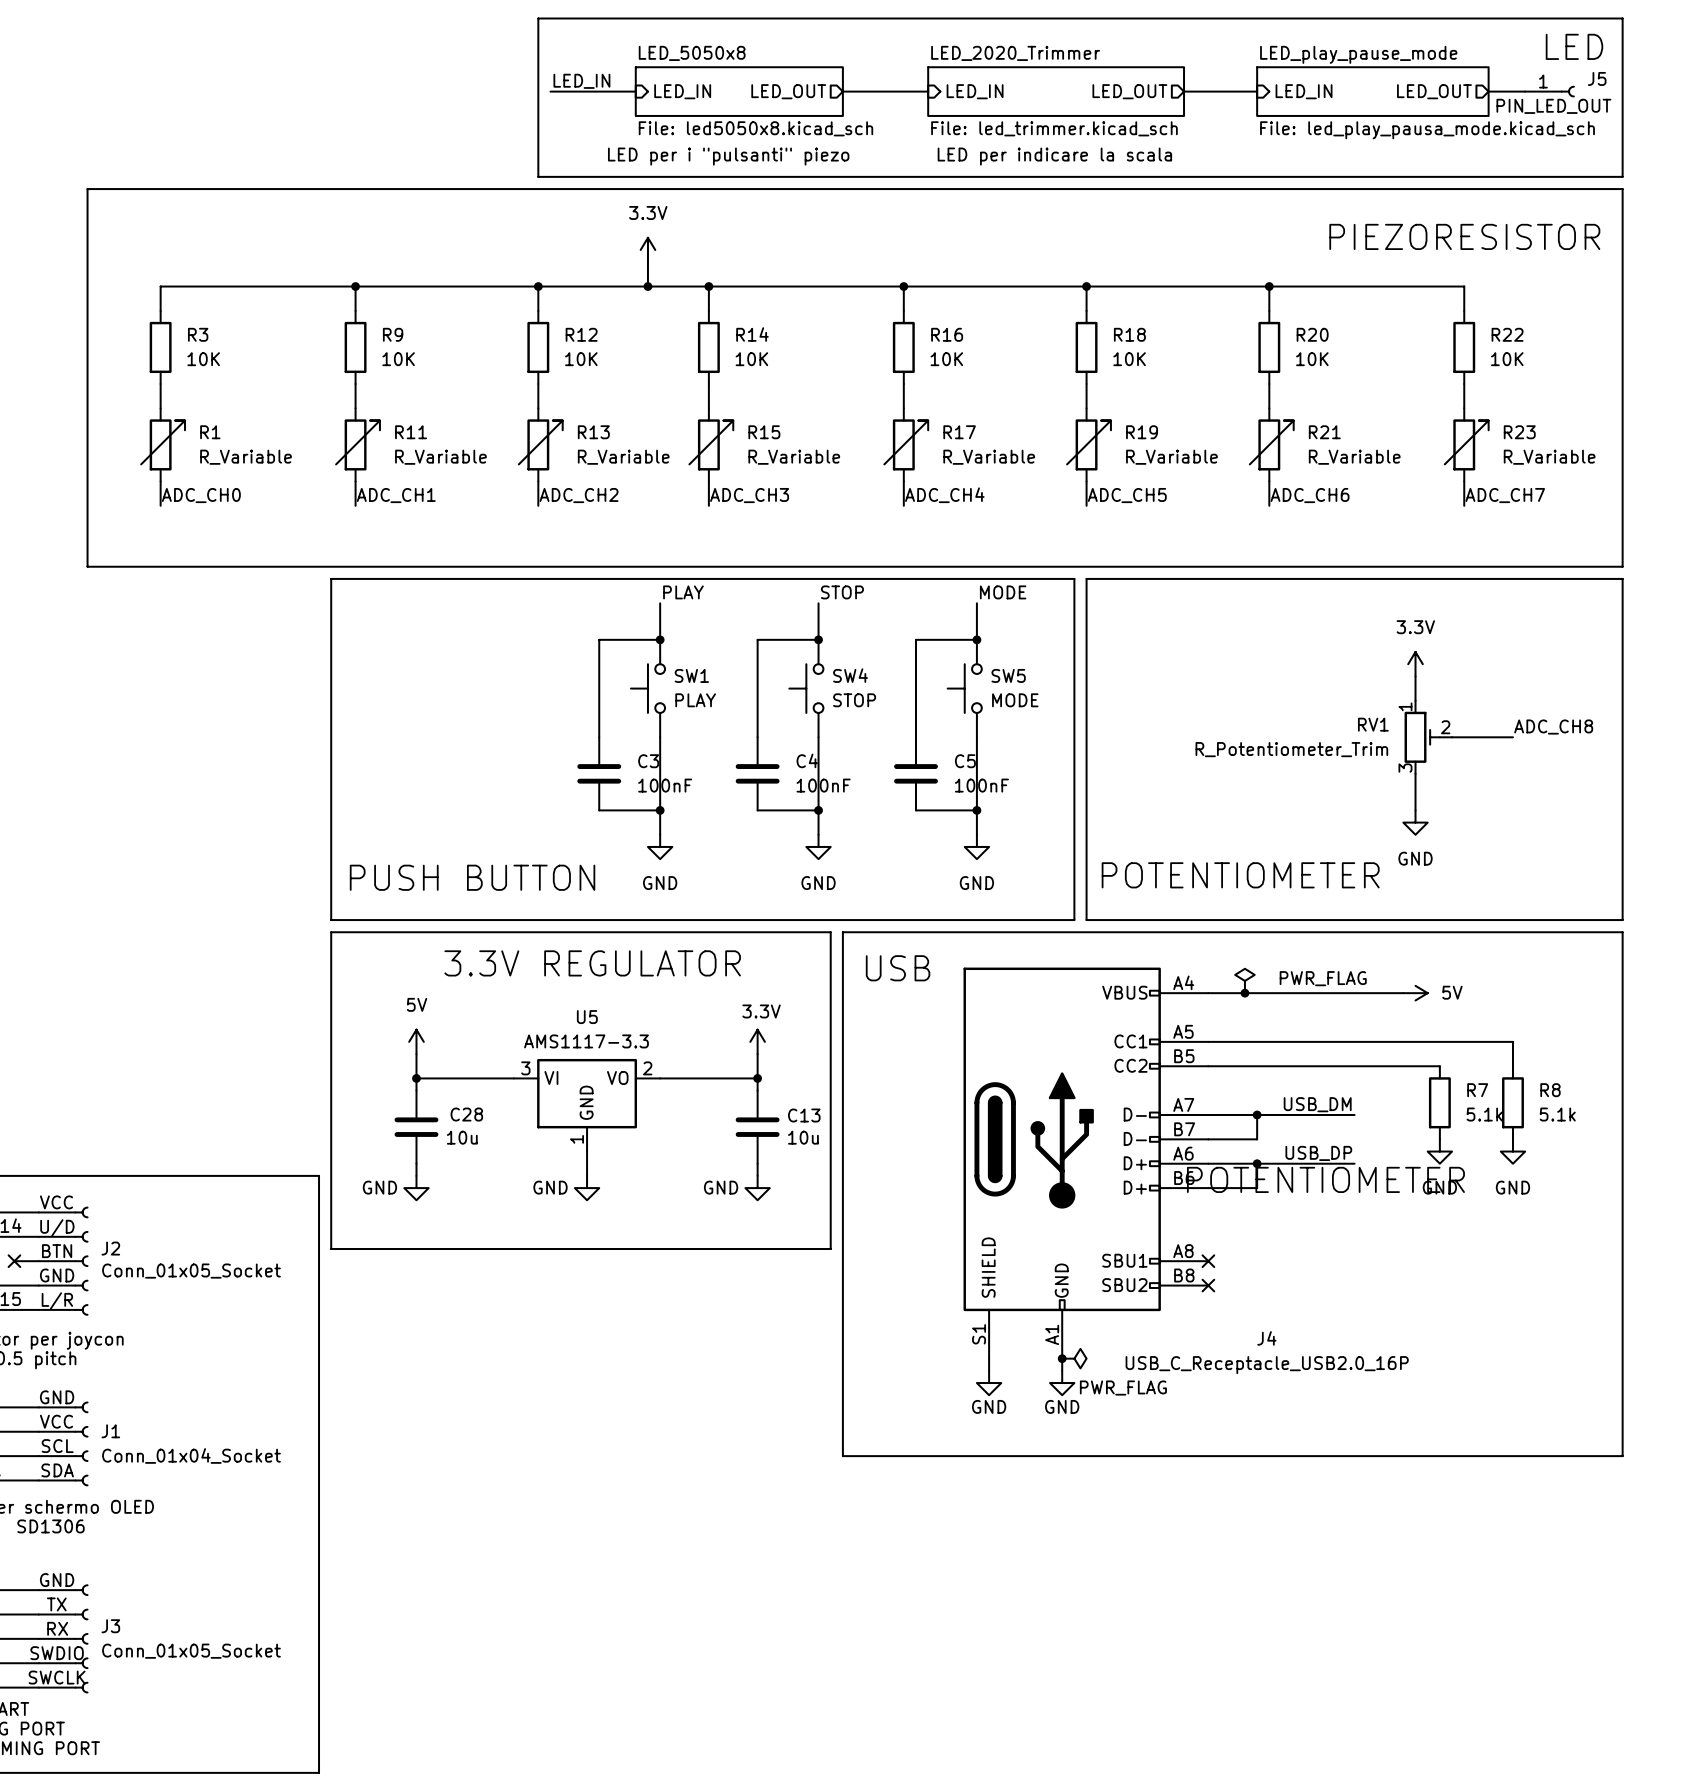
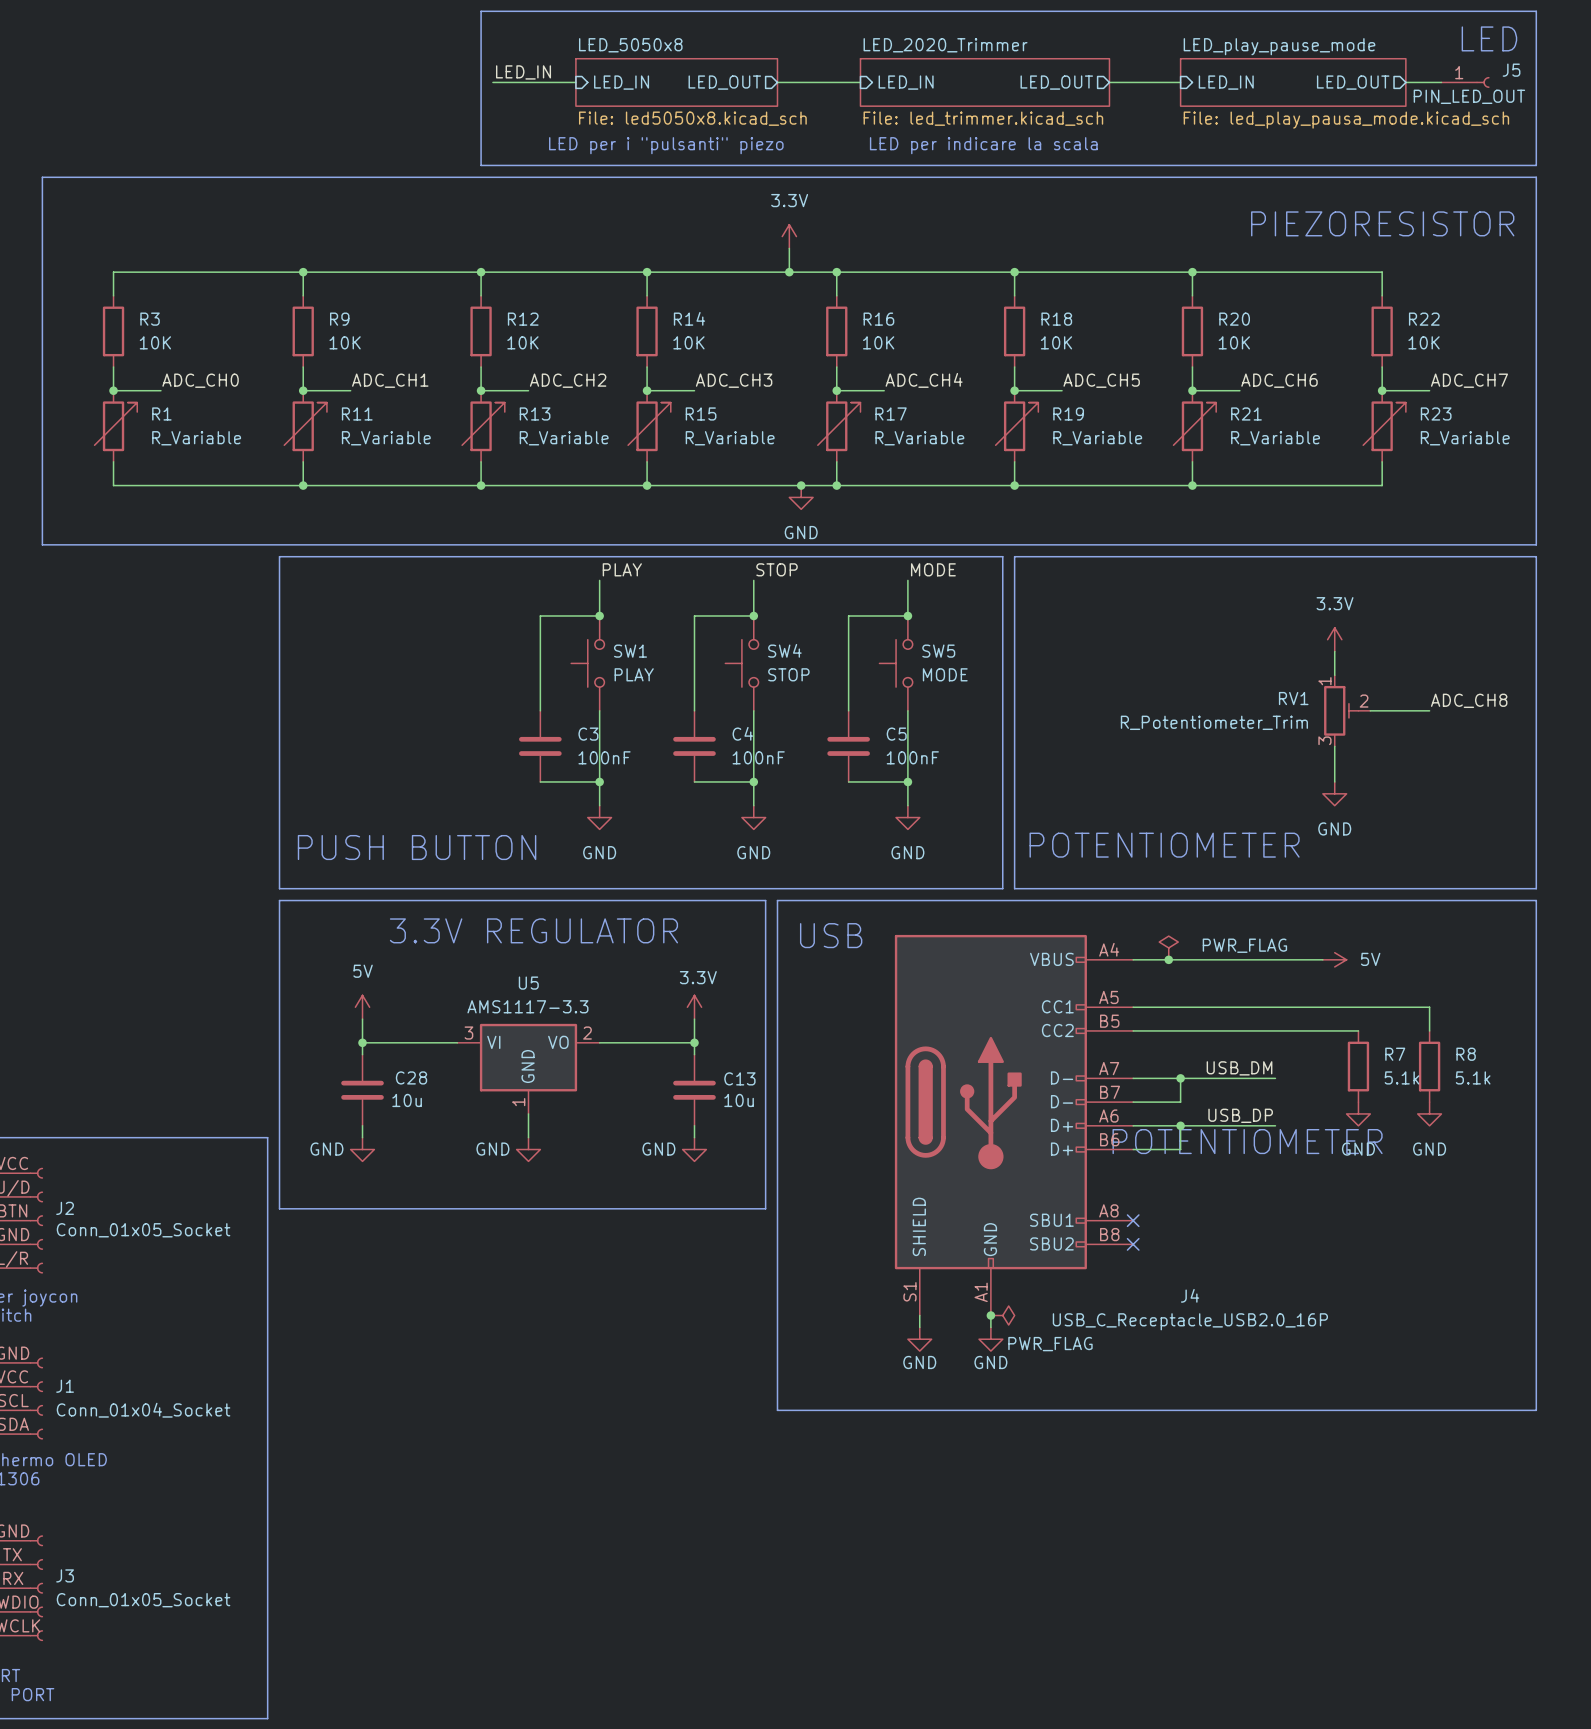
power symbol position: 3.3V (647, 249) -> 3.3V (789, 236)
wire: (647, 262) (647, 286) -> (789, 248) (789, 272)
junction: (647, 286) -> none
junction: none -> (789, 272)
wire: none -> (113, 390) (160, 390)
junction: none -> (113, 390)
wire: none -> (303, 390) (350, 390)
junction: none -> (303, 390)
wire: none -> (481, 390) (528, 390)
junction: none -> (481, 390)
wire: none -> (647, 390) (694, 390)
junction: none -> (647, 390)
wire: none -> (836, 390) (884, 390)
junction: none -> (836, 390)
wire: none -> (1014, 390) (1062, 390)
junction: none -> (1014, 390)
wire: none -> (1192, 390) (1239, 390)
junction: none -> (1192, 390)
wire: none -> (1382, 390) (1429, 390)
junction: none -> (1382, 390)
label position: ADC_CH0 (201, 495) -> ADC_CH0 (200, 380)
label position: ADC_CH1 (396, 495) -> ADC_CH1 (390, 380)
label position: ADC_CH2 (579, 495) -> ADC_CH2 (568, 380)
label position: ADC_CH3 (749, 495) -> ADC_CH3 (734, 380)
label position: ADC_CH4 (944, 495) -> ADC_CH4 (924, 380)
label position: ADC_CH5 (1127, 495) -> ADC_CH5 (1101, 380)
label position: ADC_CH6 (1310, 495) -> ADC_CH6 (1279, 380)
label position: ADC_CH7 (1505, 495) -> ADC_CH7 (1469, 380)
wire: none -> (113, 485) (1382, 485)
junction: none -> (303, 485)
junction: none -> (481, 485)
junction: none -> (647, 485)
junction: none -> (801, 485)
junction: none -> (836, 485)
junction: none -> (1014, 485)
junction: none -> (1192, 485)
power symbol: none -> GND (801, 497)

